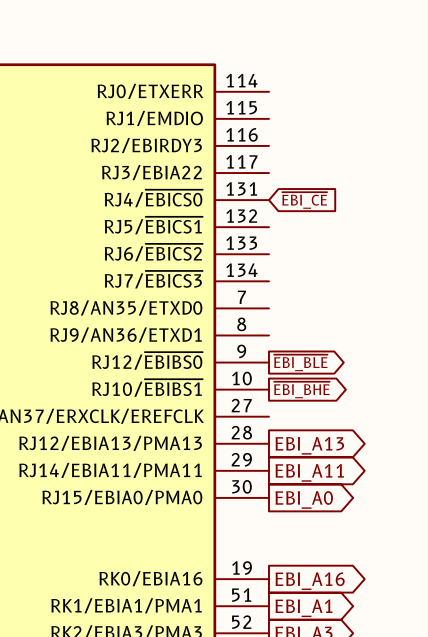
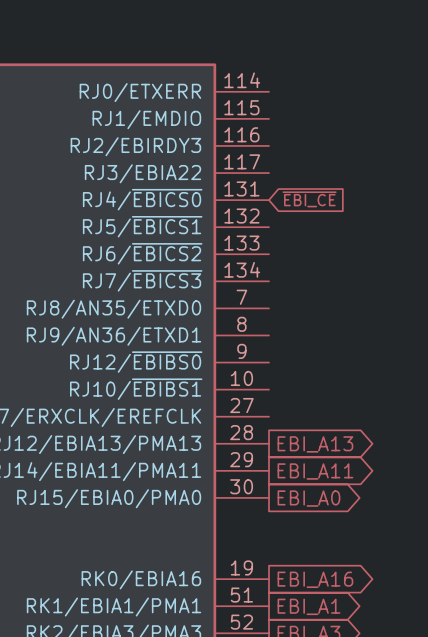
global label: ~{EBI_BLE} (300, 362) -> none
global label: ~{EBI_BHE} (301, 390) -> none

